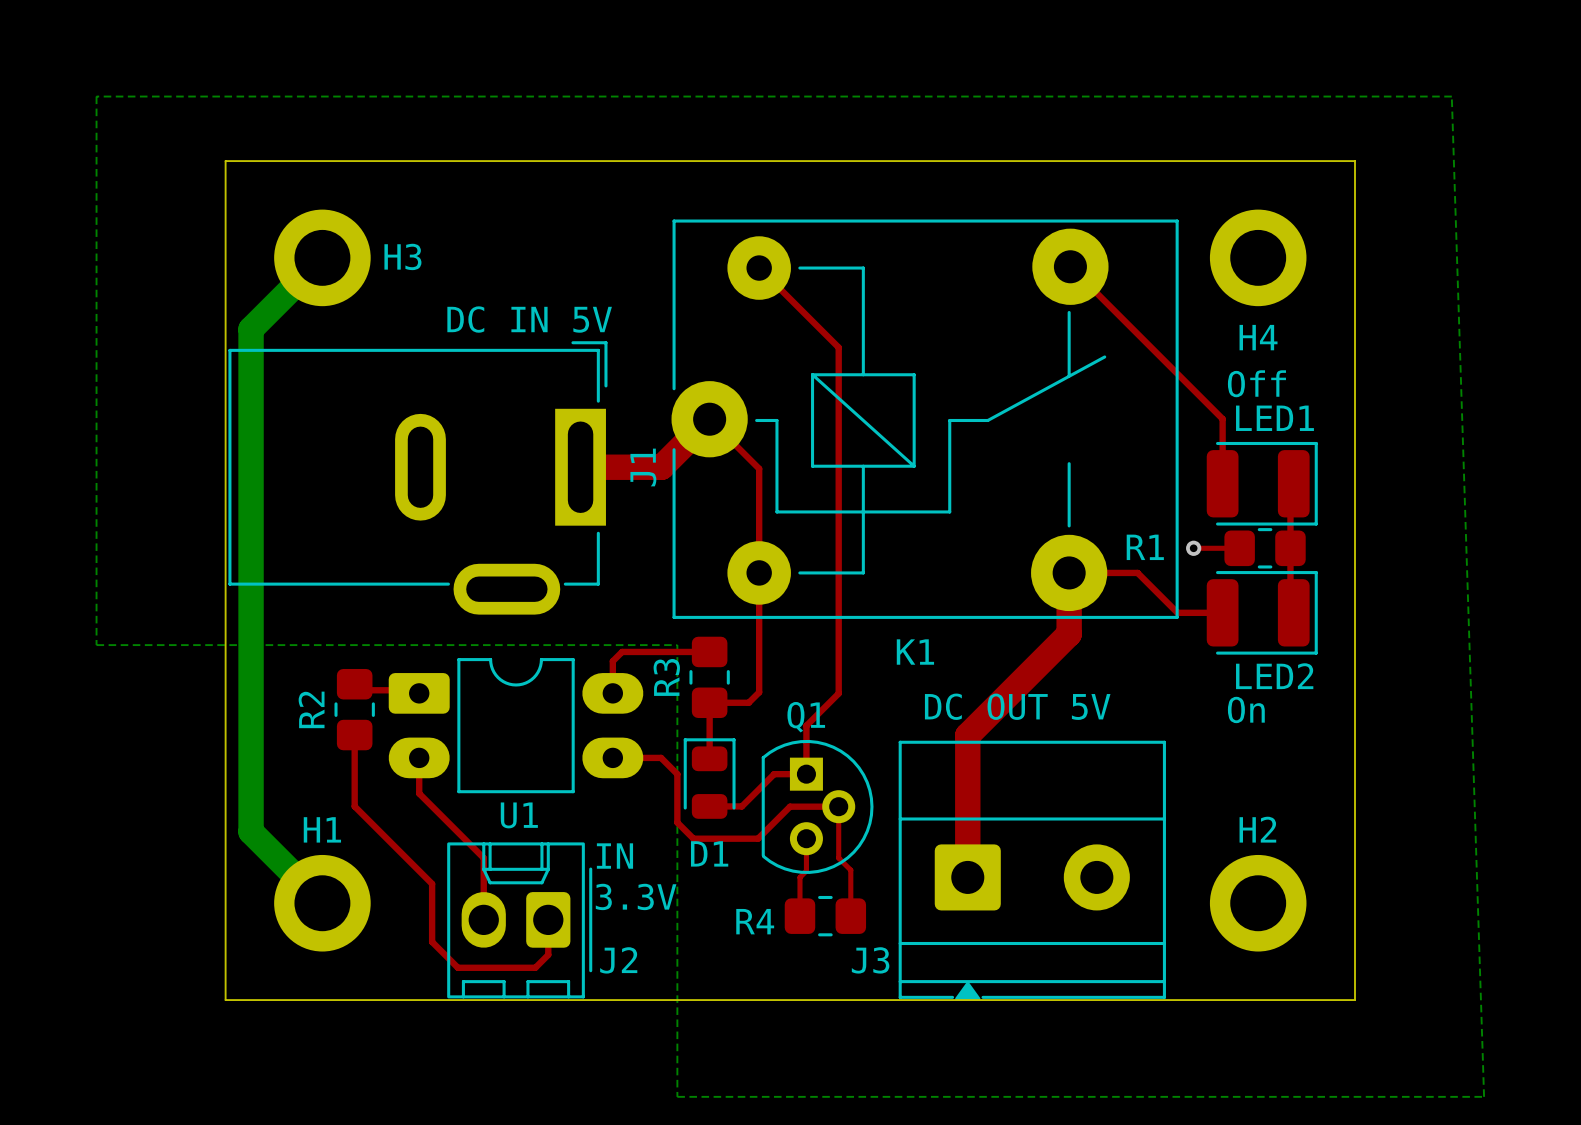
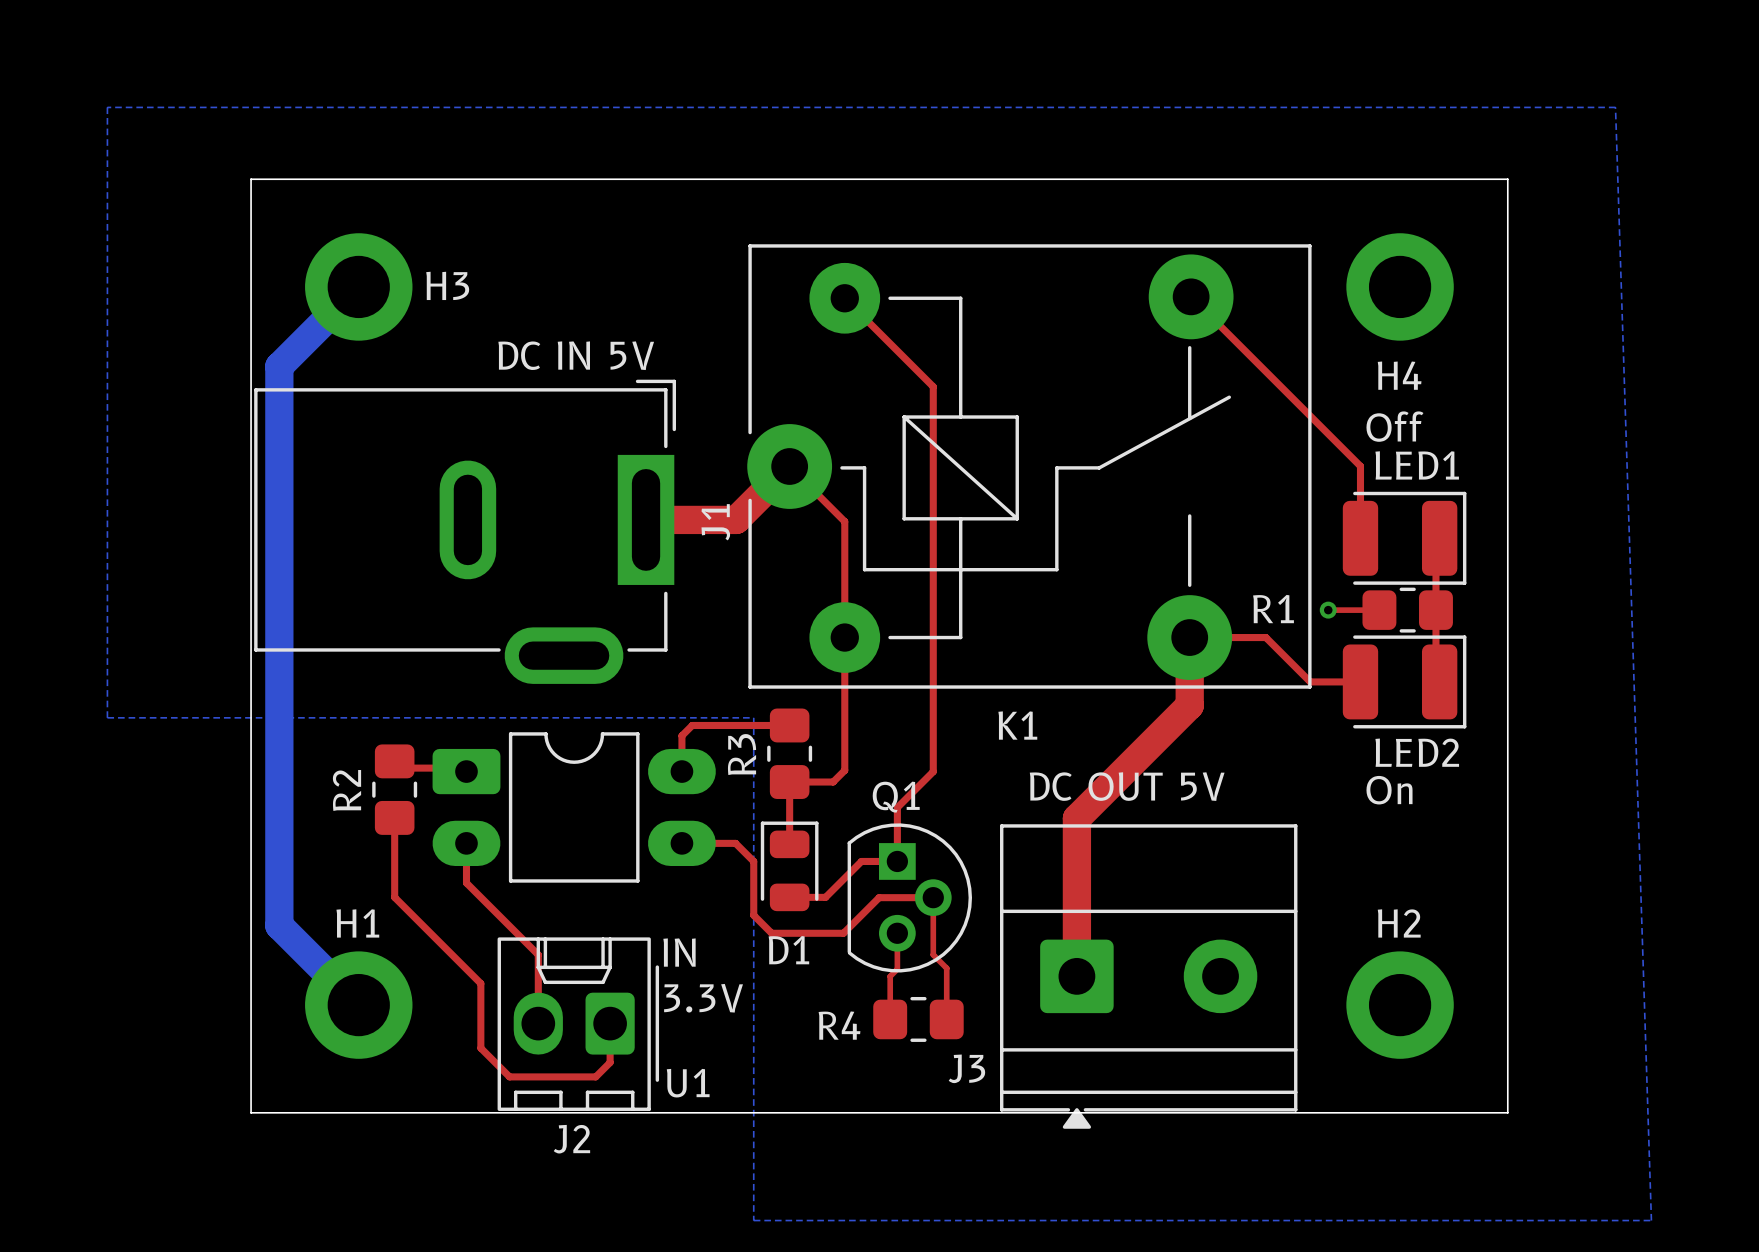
J3 footprint: [898, 740, 1166, 1001] -> [1000, 824, 1298, 1129]
U1 name position: U1 (519, 815) -> U1 (688, 1083)
J2 name position: J2 (618, 960) -> J2 (571, 1139)

